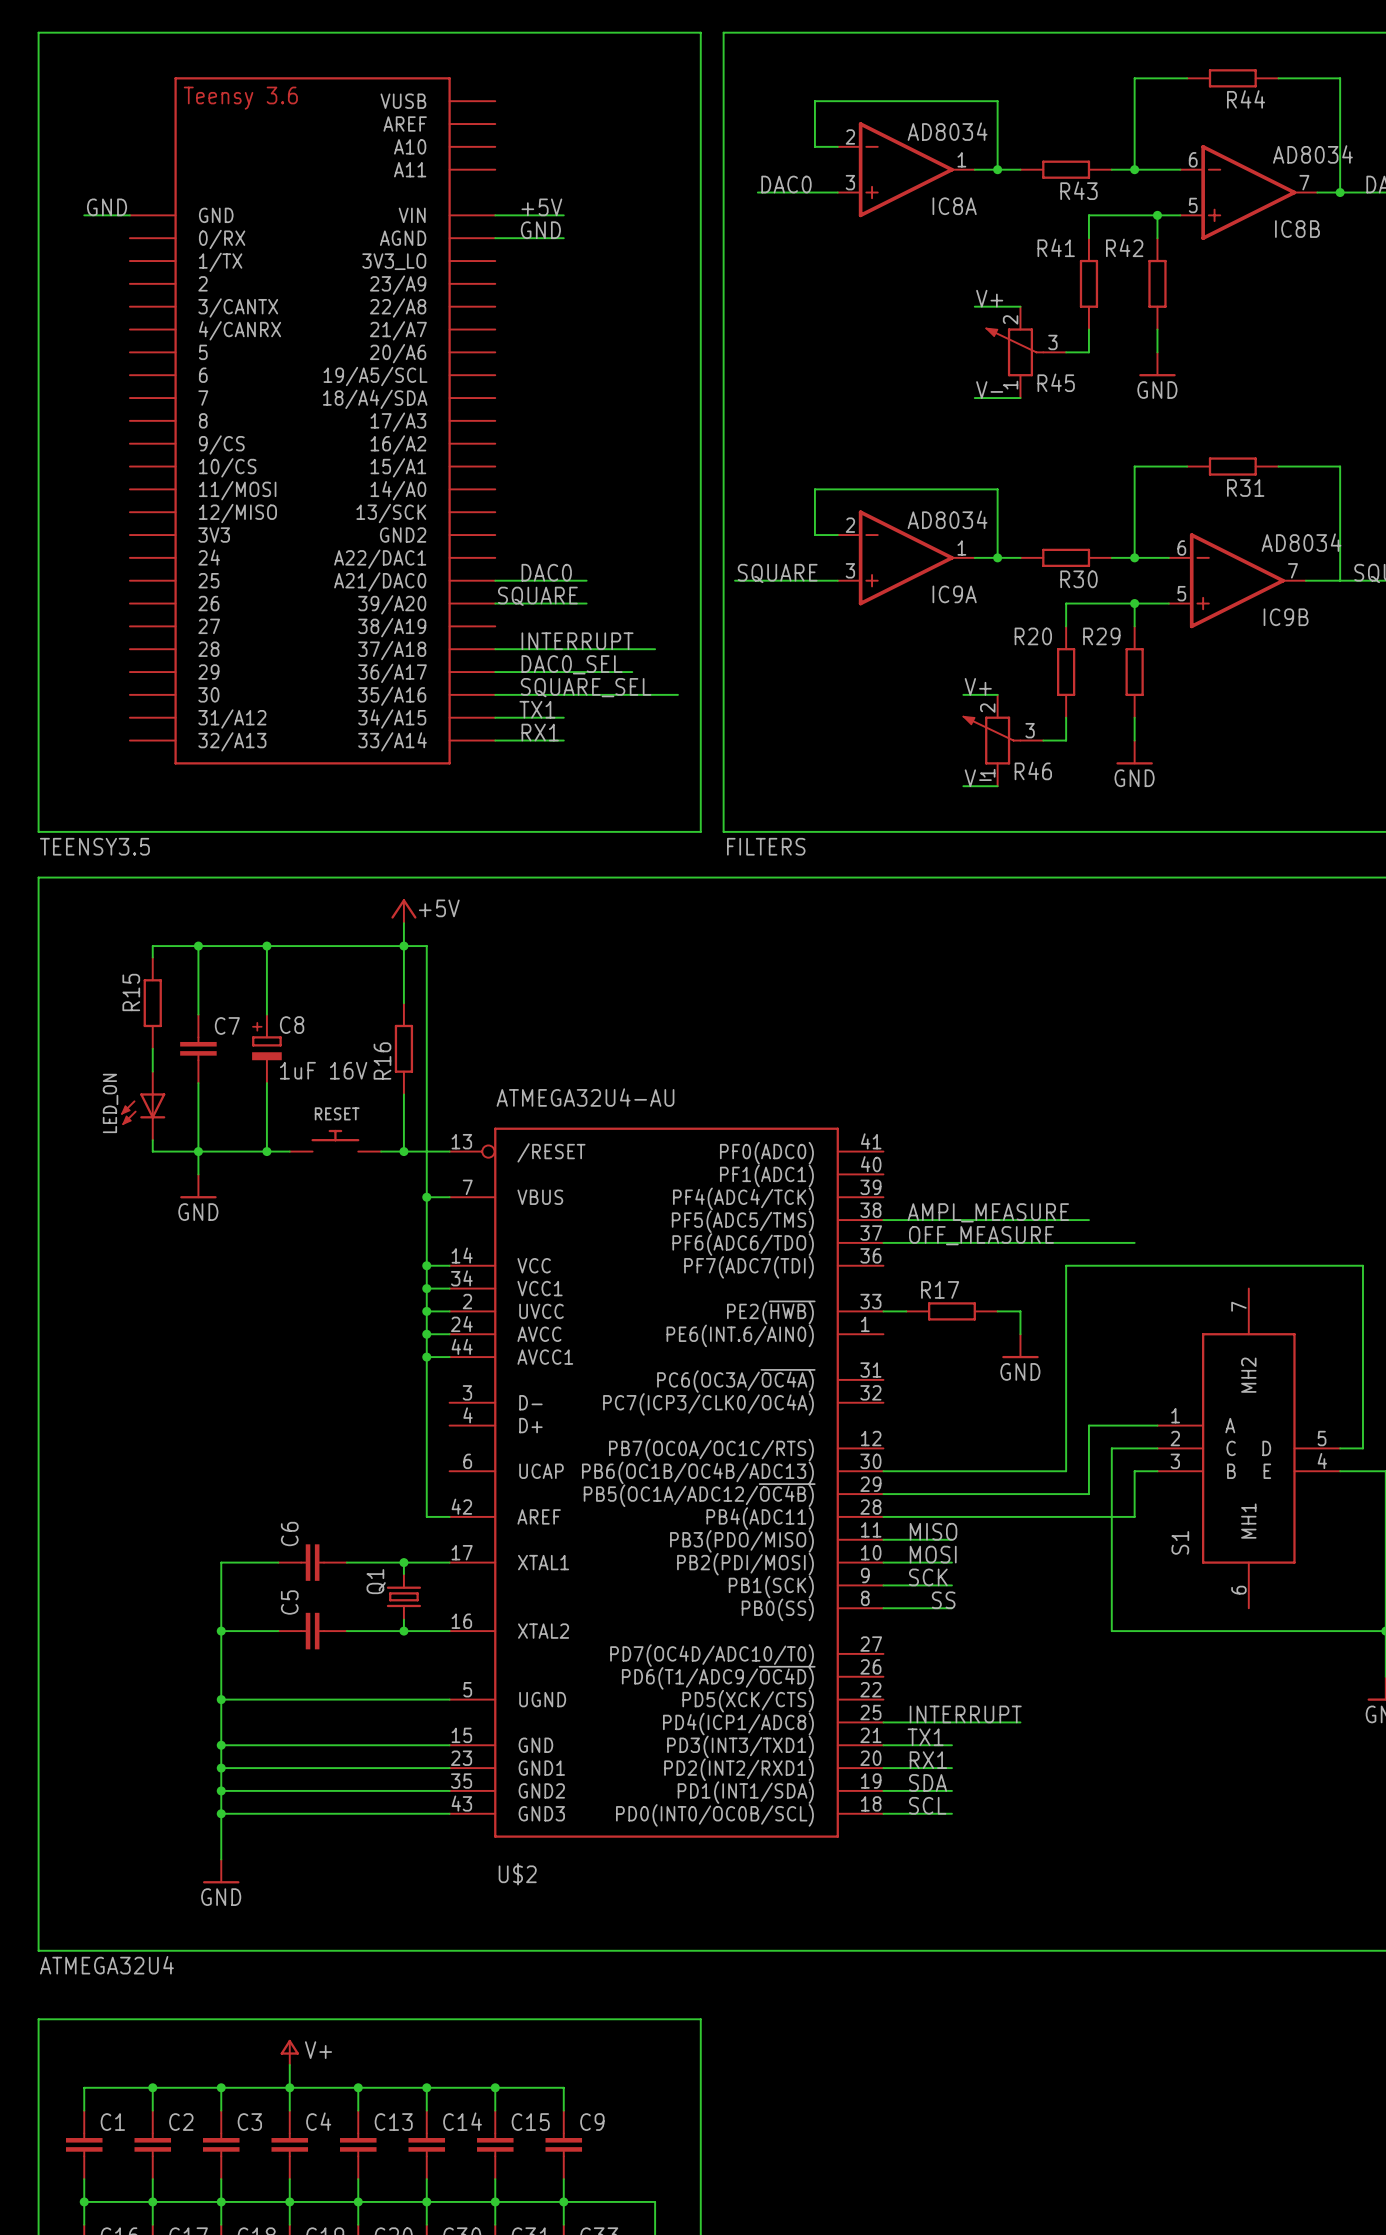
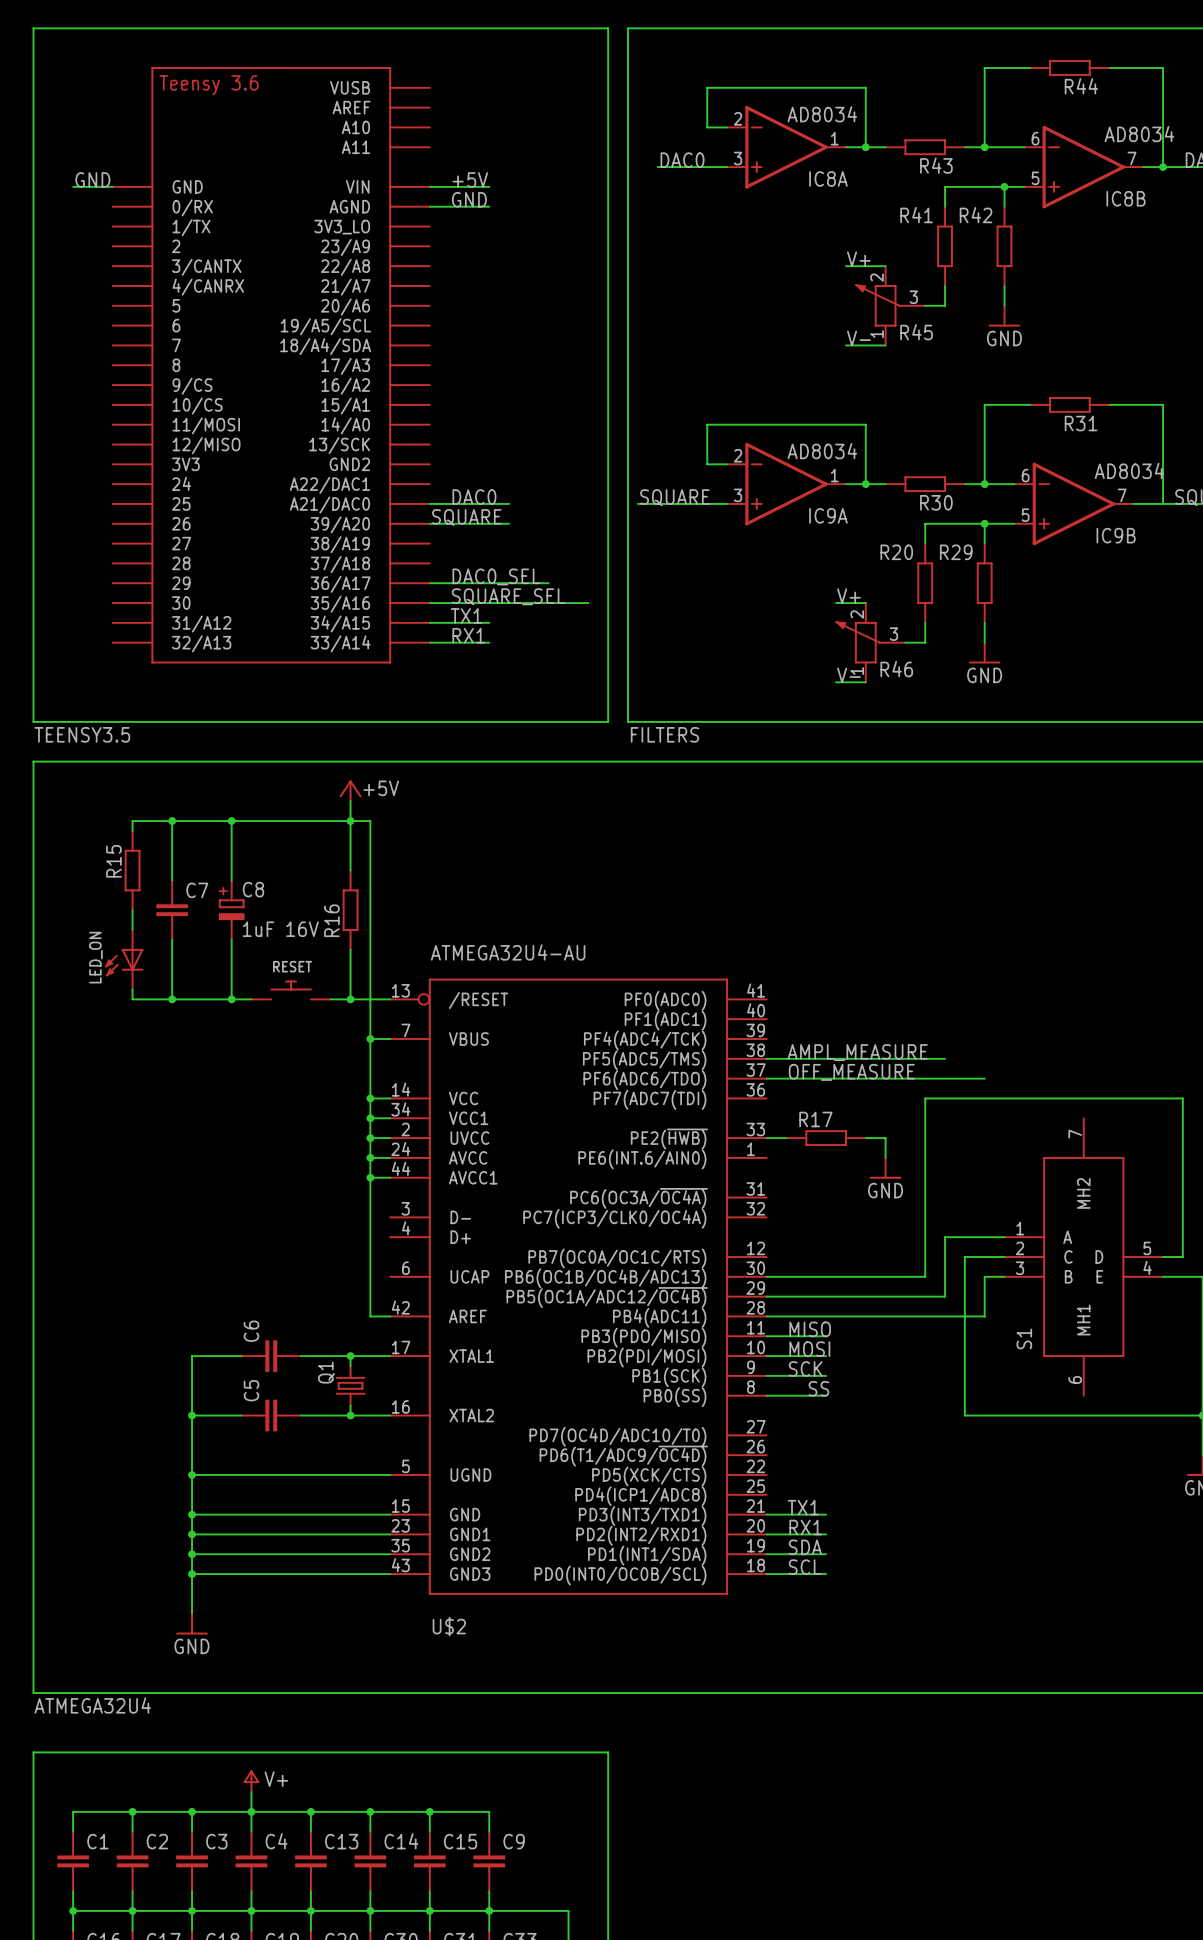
label: INTERRUPT (577, 641) -> none
wire: (495, 649) (655, 649) -> none
wire: (198, 1151) (198, 1174) -> none
power symbol: GND (198, 1186) -> none
label: INTERRUPT (965, 1714) -> none
wire: (883, 1722) (1020, 1722) -> none

